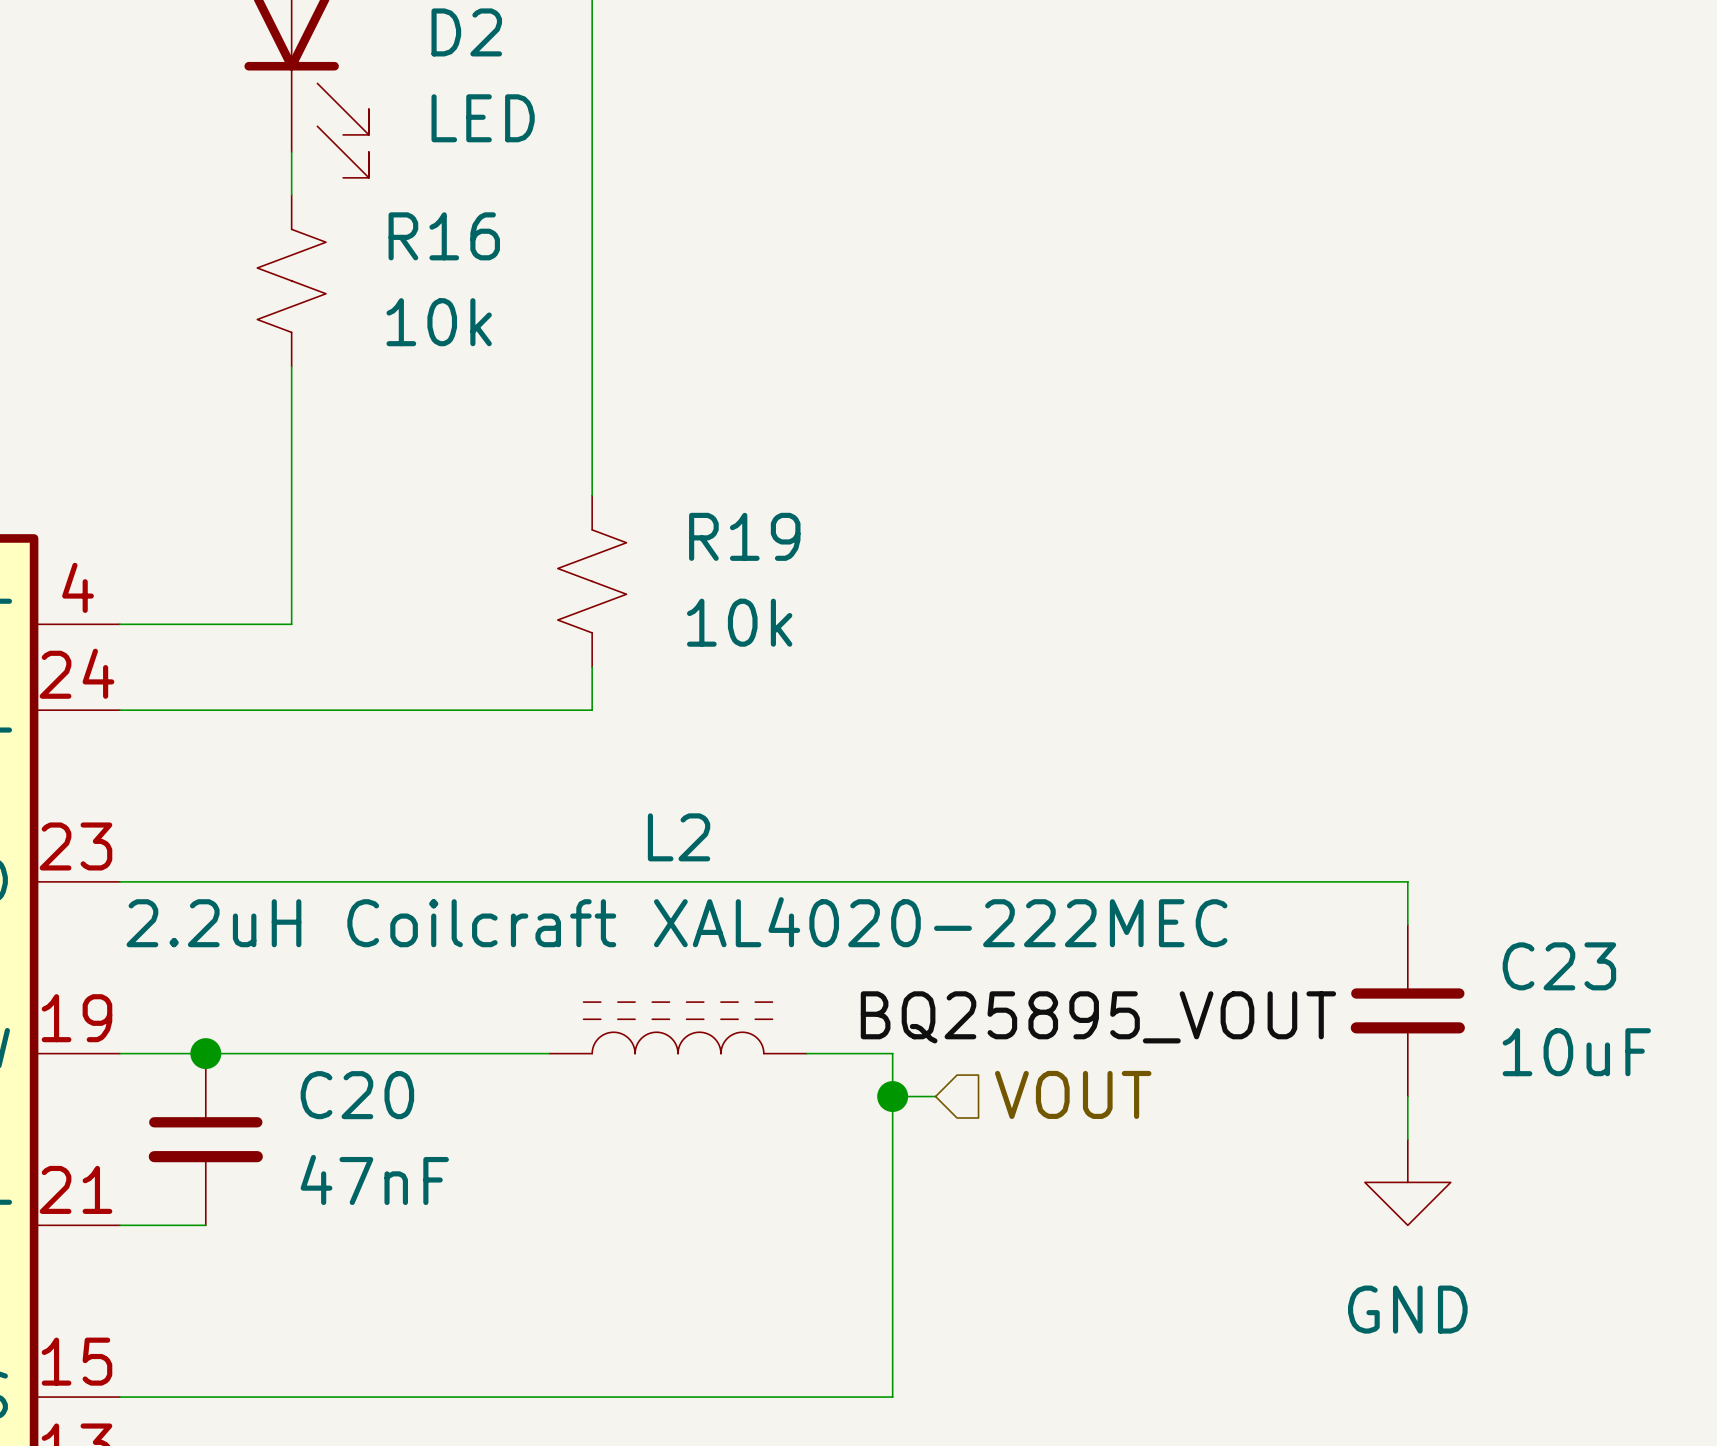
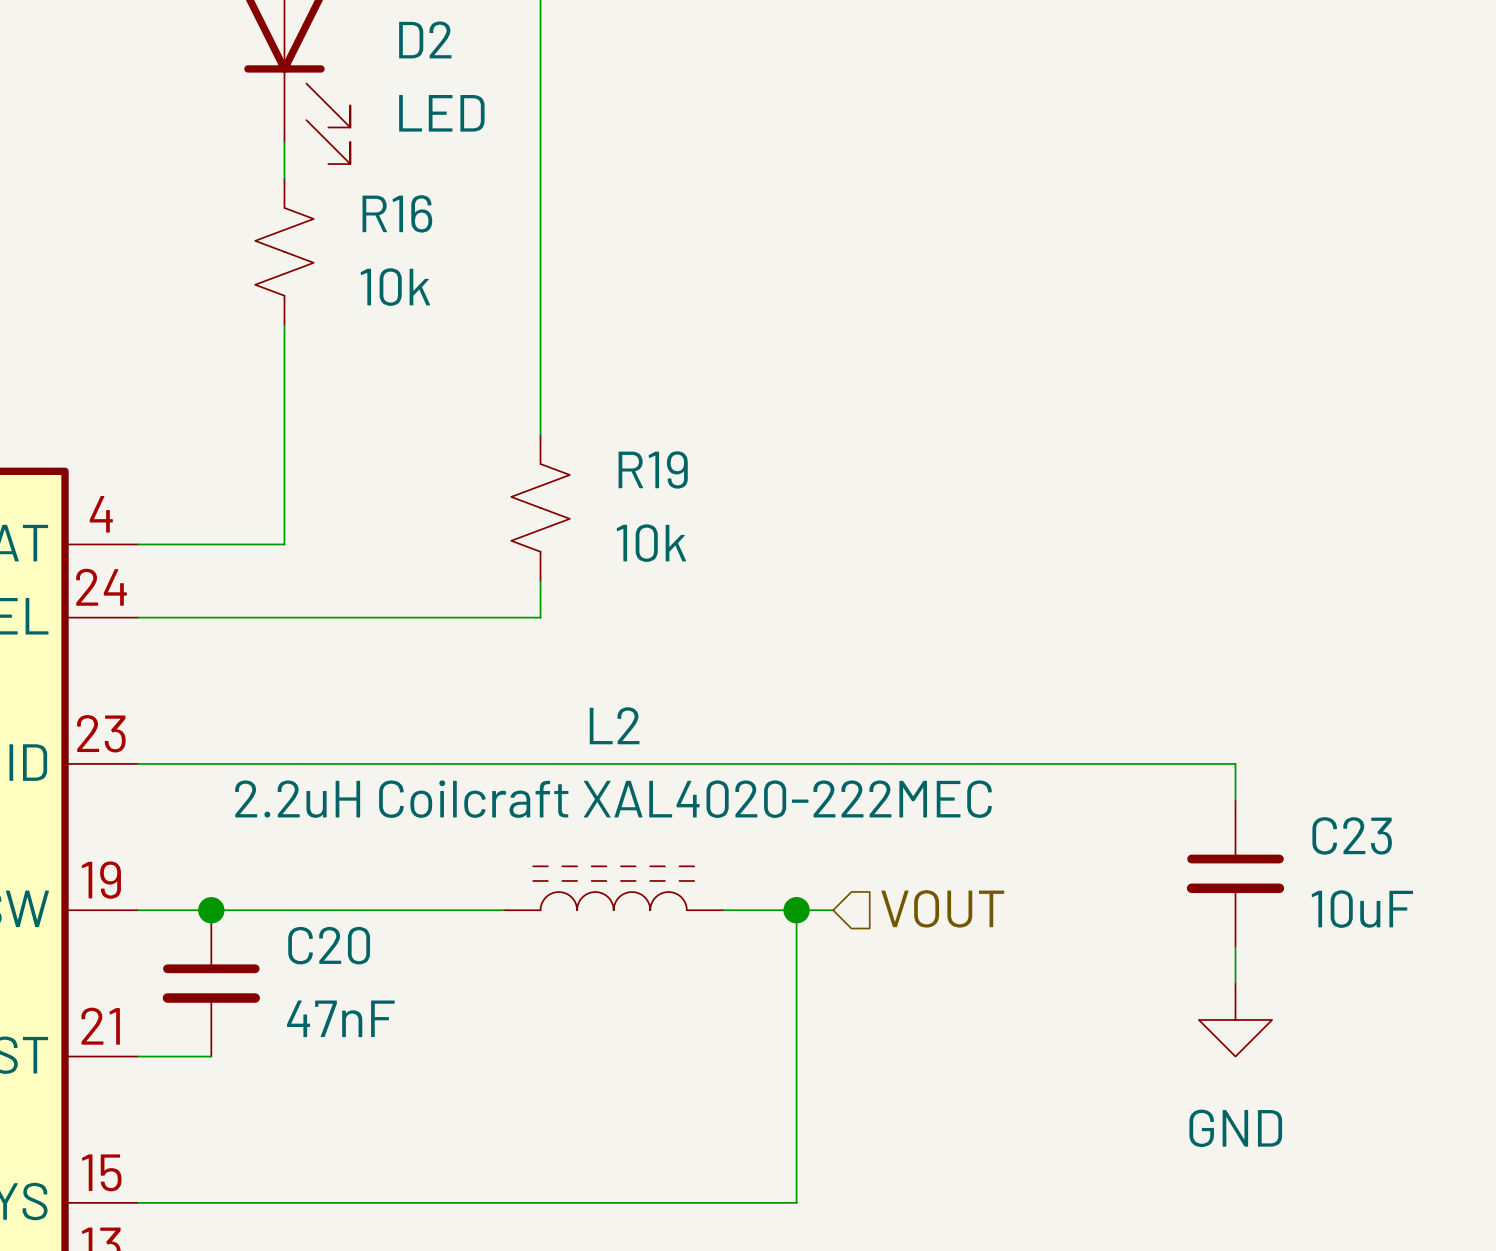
label: BQ25895_VOUT (1098, 1017) -> none
hierarchical label position: VOUT (1073, 1094) -> VOUT (942, 908)
wire: (892, 1096) (935, 1096) -> (796, 910) (833, 910)
junction position: (892, 1096) -> (796, 910)

